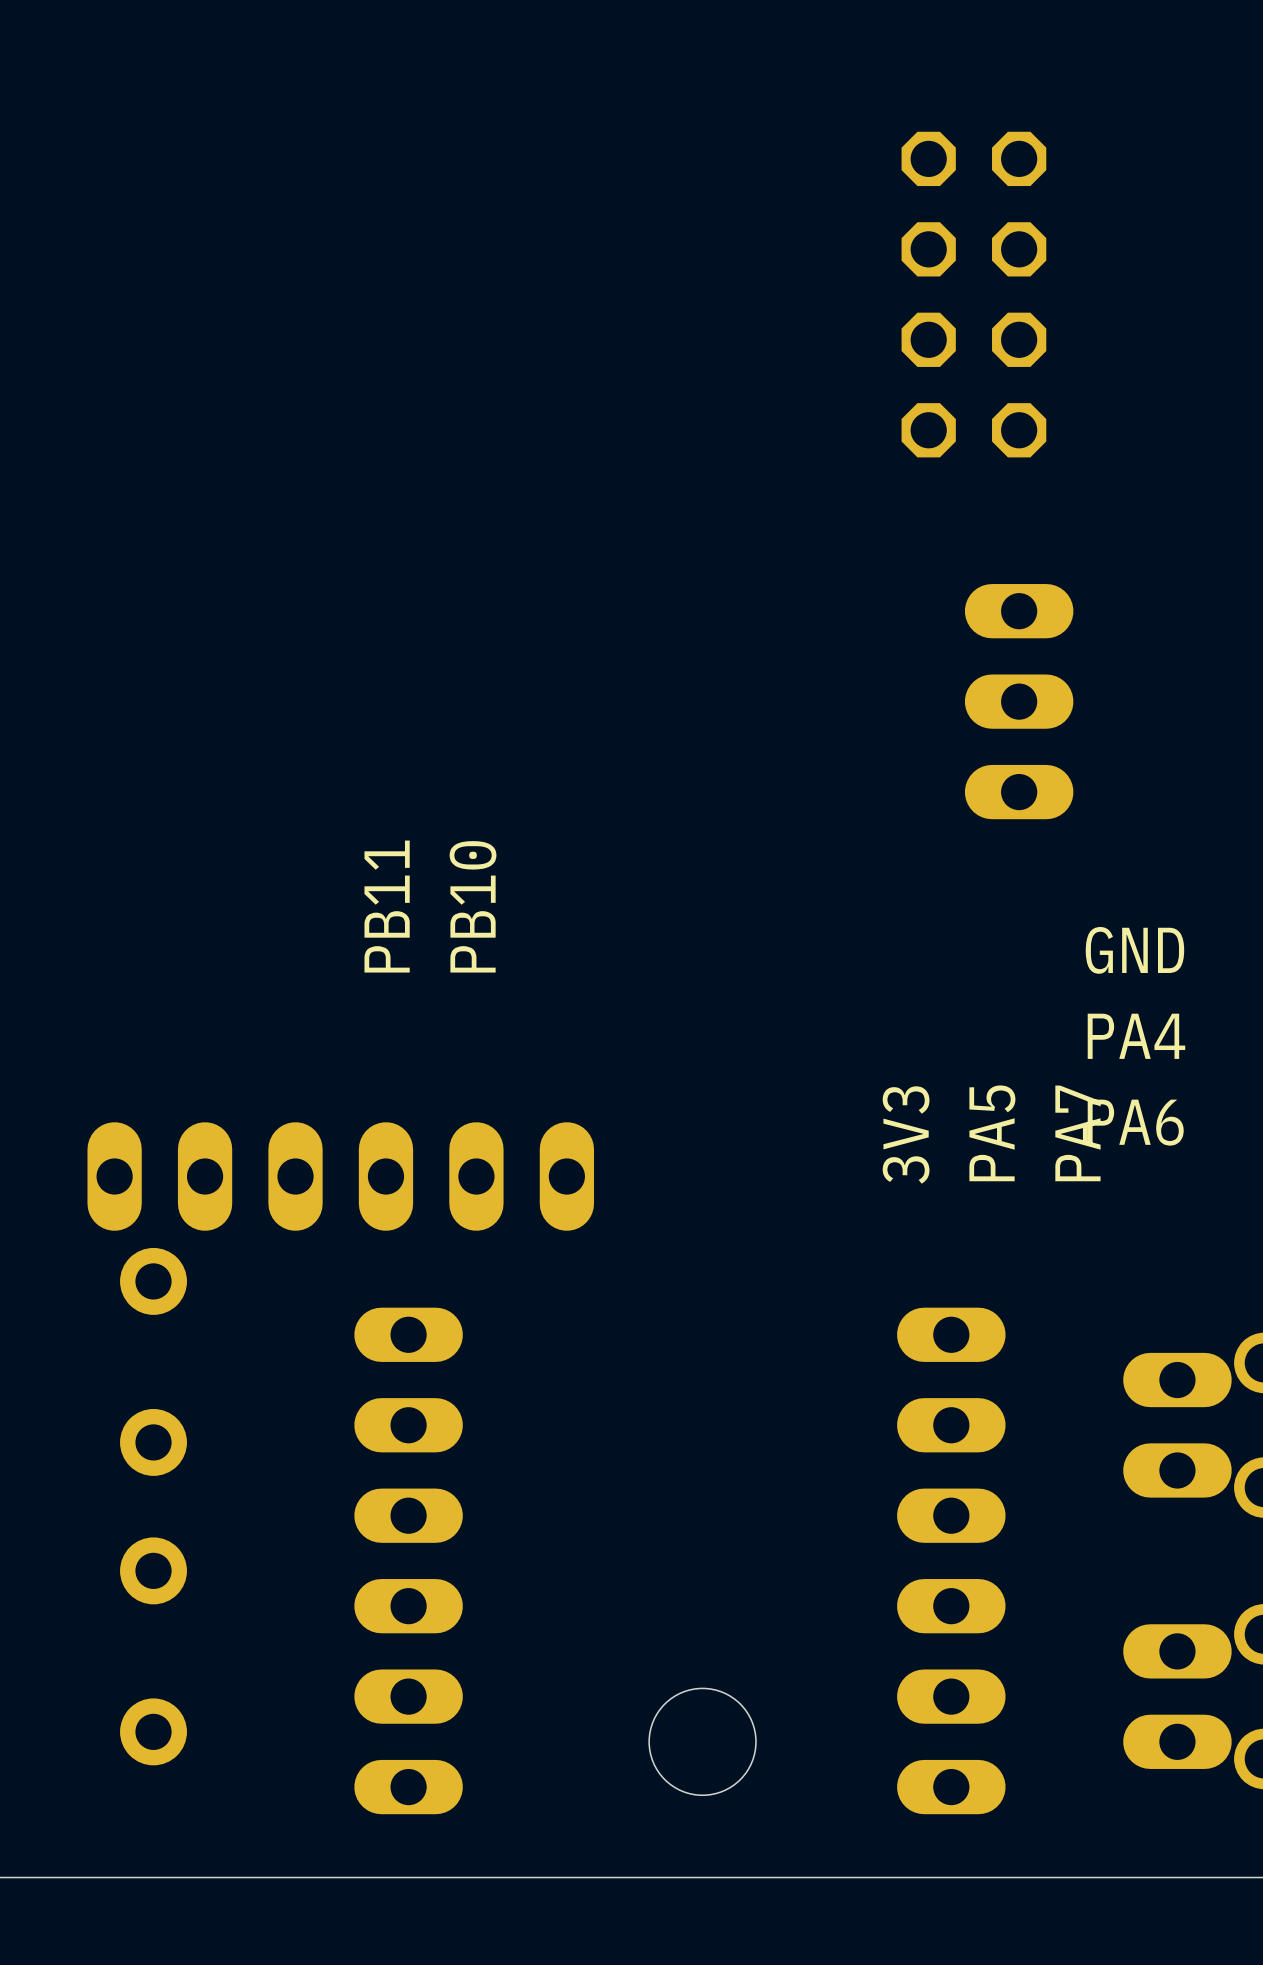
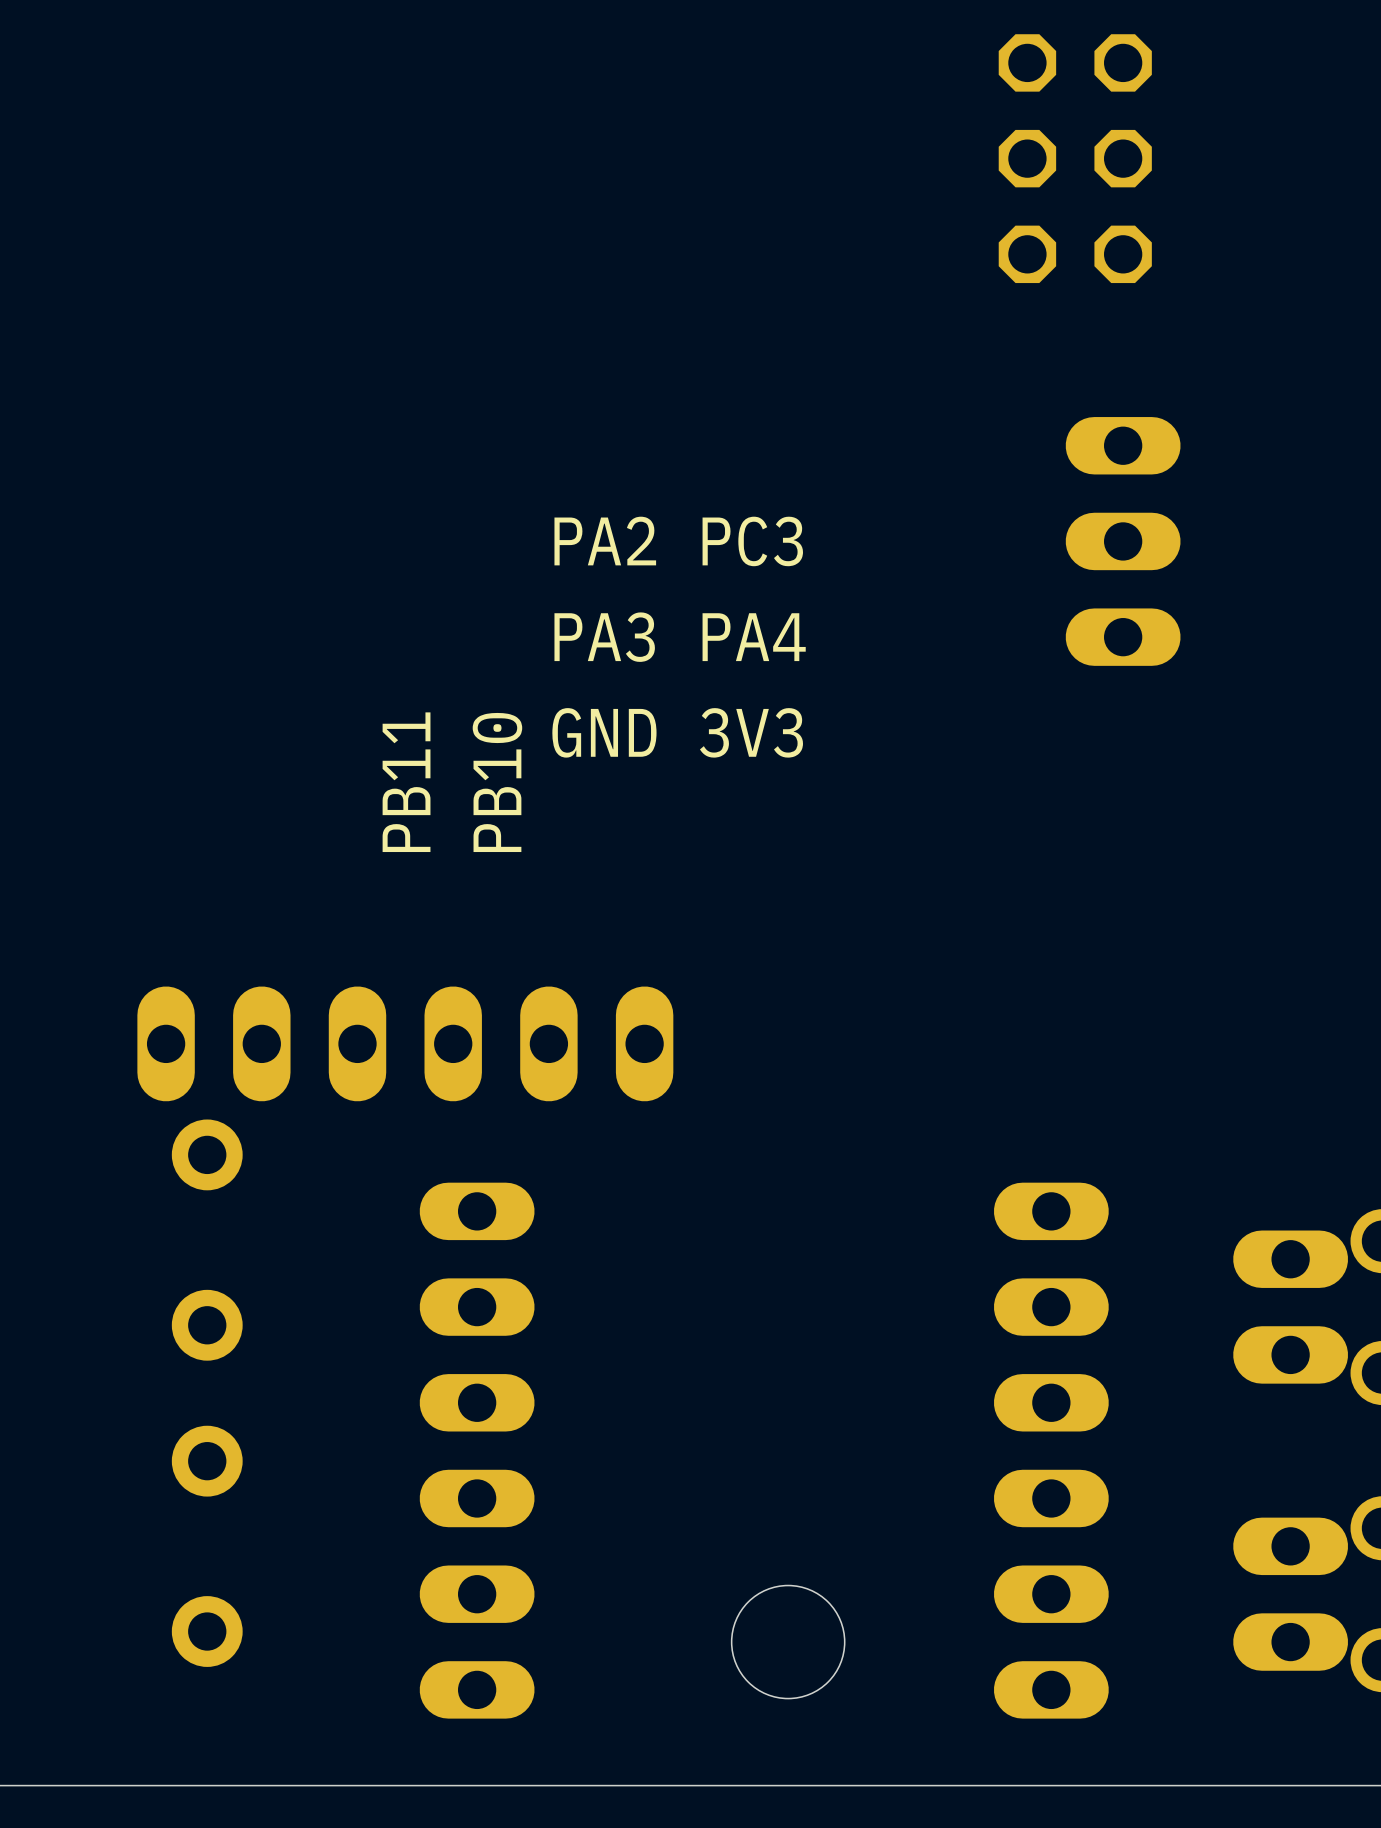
text: none -> PA2 PC3 (678, 541)
text: none -> PA3 PA4 (680, 637)
text: none -> GND 3V3 (677, 732)
text position: PB11 (387, 906) -> PB11 (406, 782)
text position: PB10 (473, 906) -> PB10 (497, 782)
text: GND (1134, 950) -> none
text: PA4 (1136, 1036) -> none
text: PA6 (1135, 1122) -> none
text: PA5 (992, 1133) -> none
text: PA7 (1077, 1133) -> none
text: 3V3 (906, 1135) -> none

